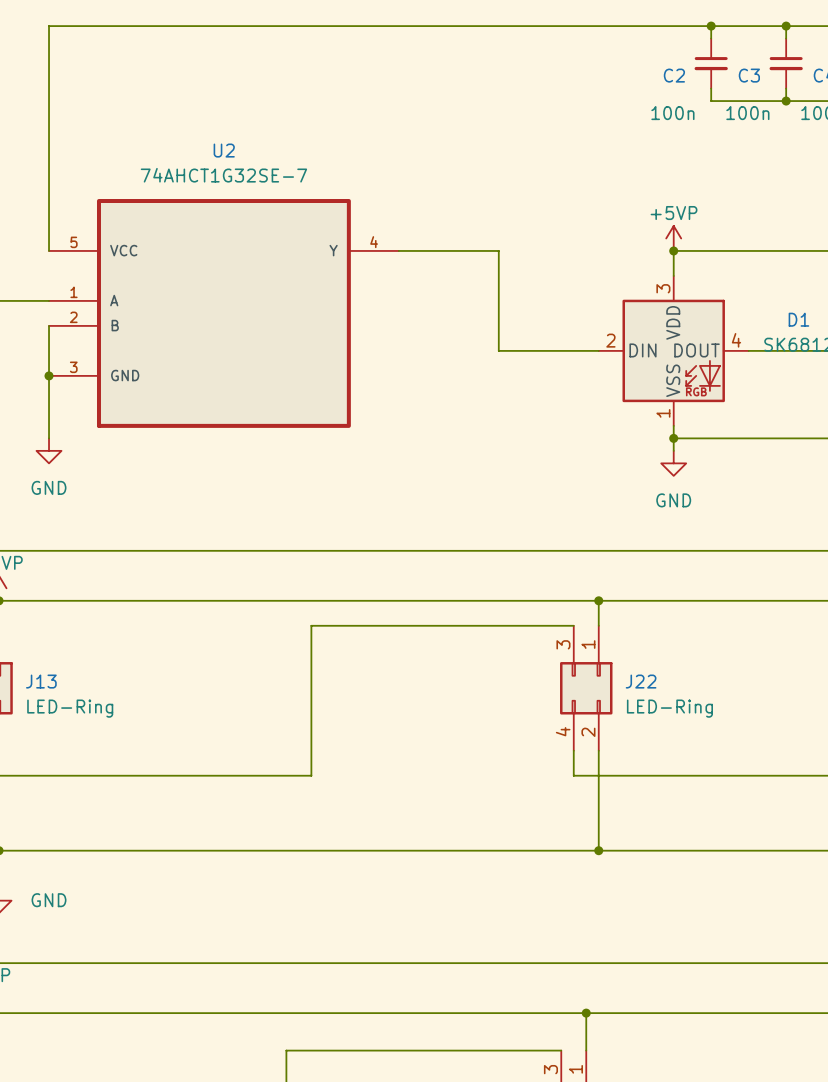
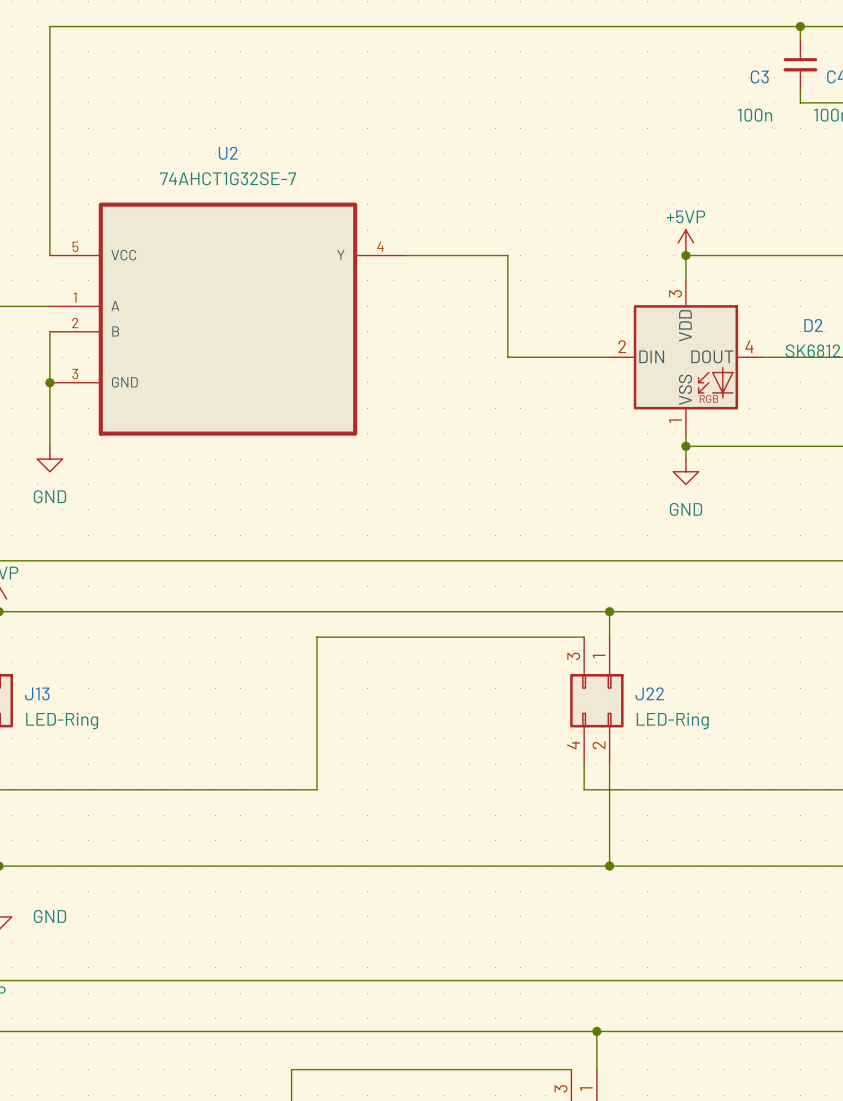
wire: (711, 26) (711, 38) -> none
junction: (711, 26) -> none
C2: 100n (711, 63) -> none
wire: (711, 88) (711, 101) (786, 101) -> none
junction: (786, 101) -> none
D1 name: D1 (798, 319) -> D2 (813, 325)

